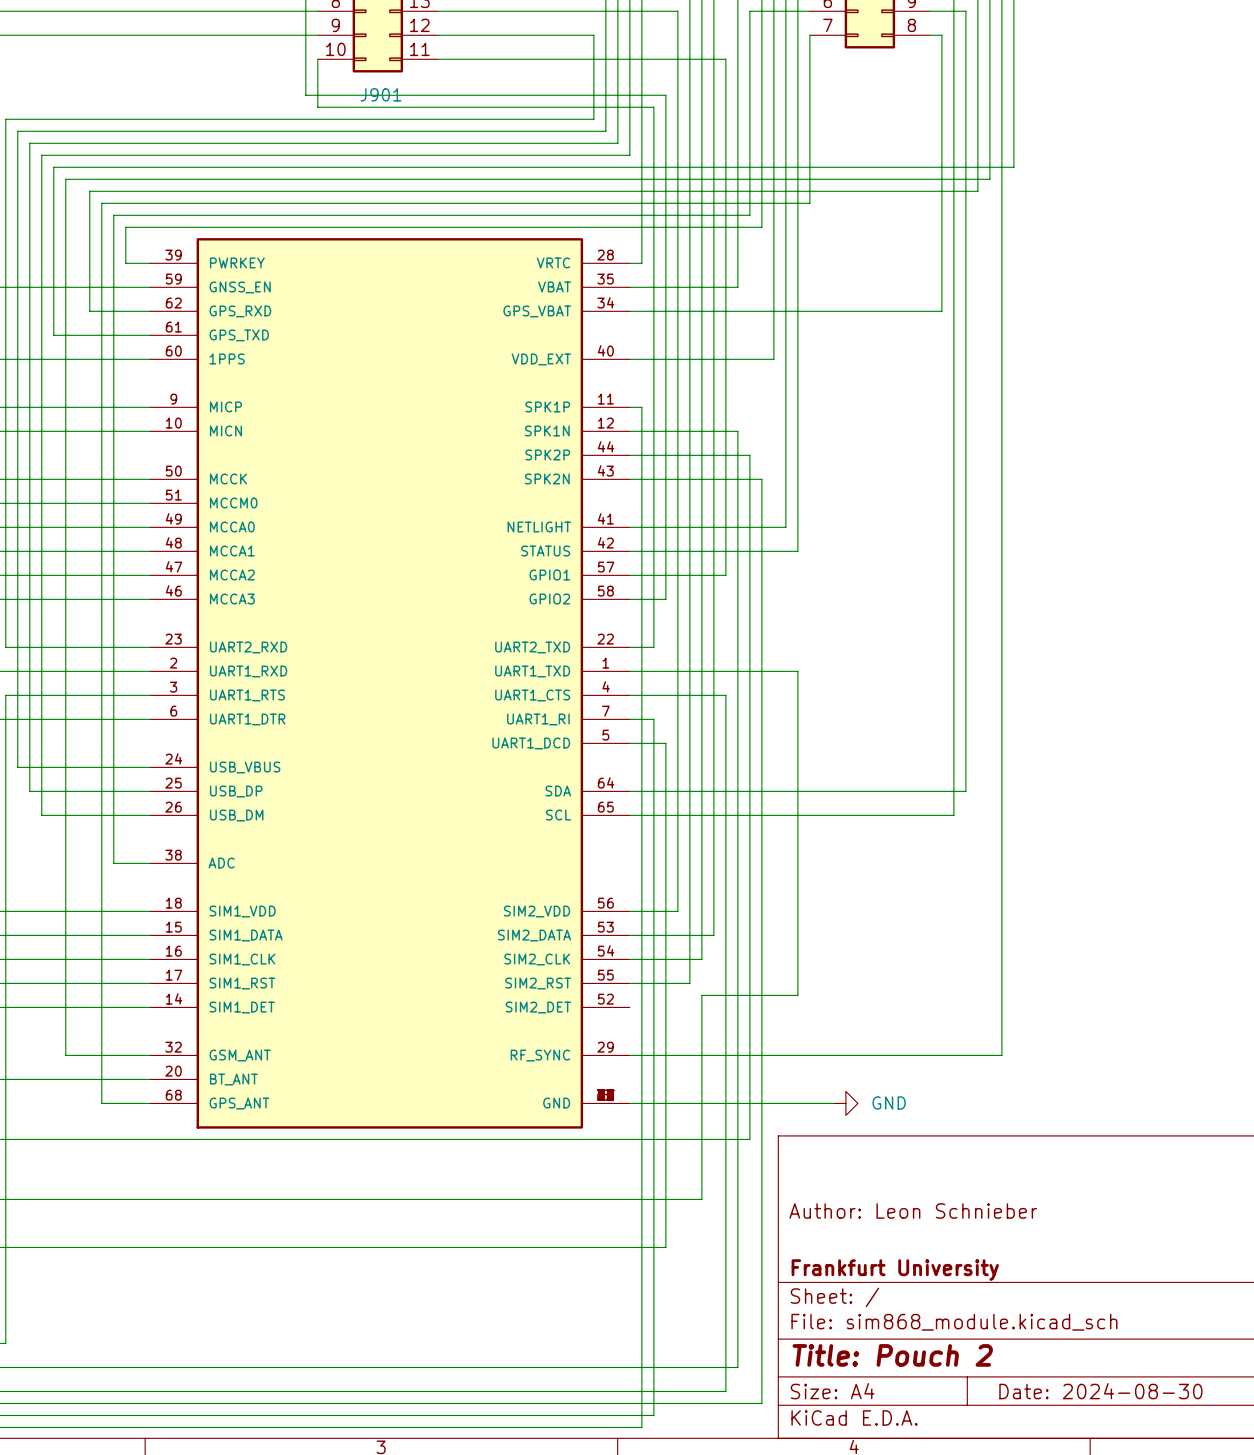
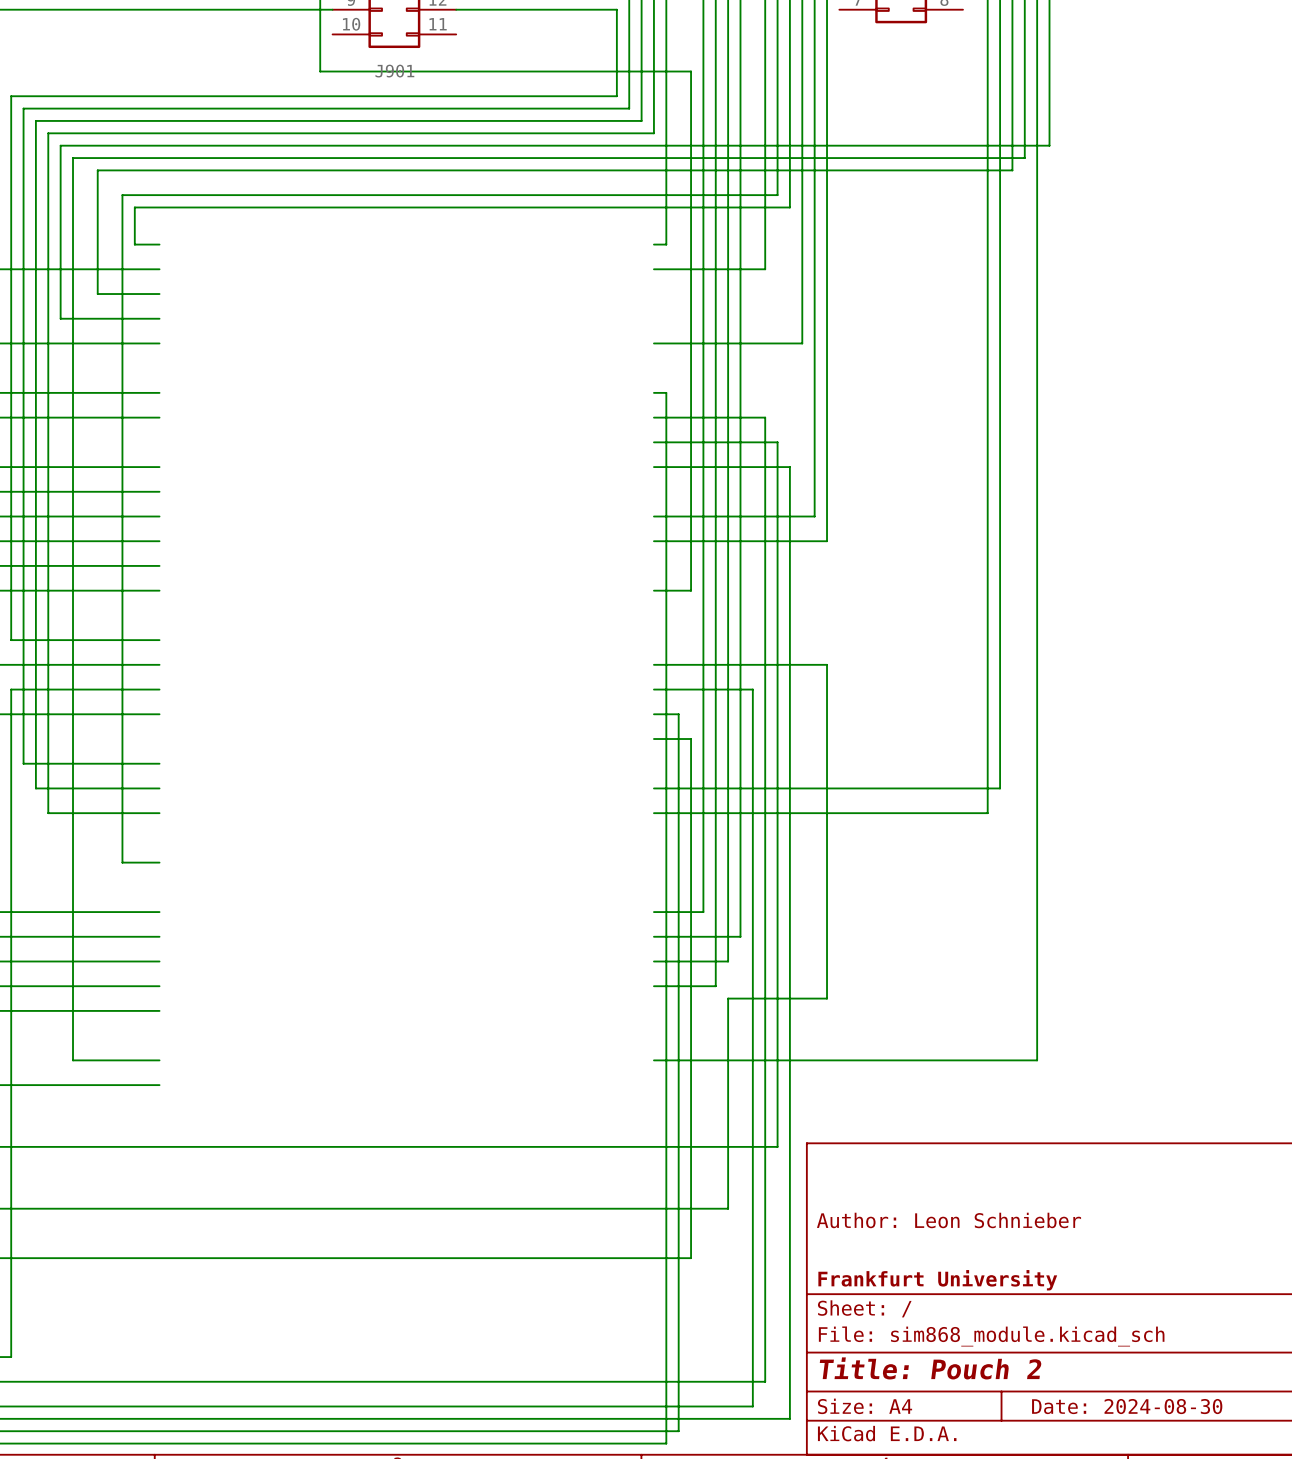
wire: (809, 35) (809, 203) (101, 203) (101, 1103) (149, 1103) -> none
wire: (929, 35) (941, 35) (941, 311) (629, 311) -> none
wire: (317, 59) (317, 107) (653, 107) (653, 647) (629, 647) -> none
wire: (437, 59) (725, 59) (725, 575) (629, 575) -> none
part: (389, 683) -> none
wire: (629, 1103) (833, 1103) -> none
power symbol: GND (845, 1103) -> none

